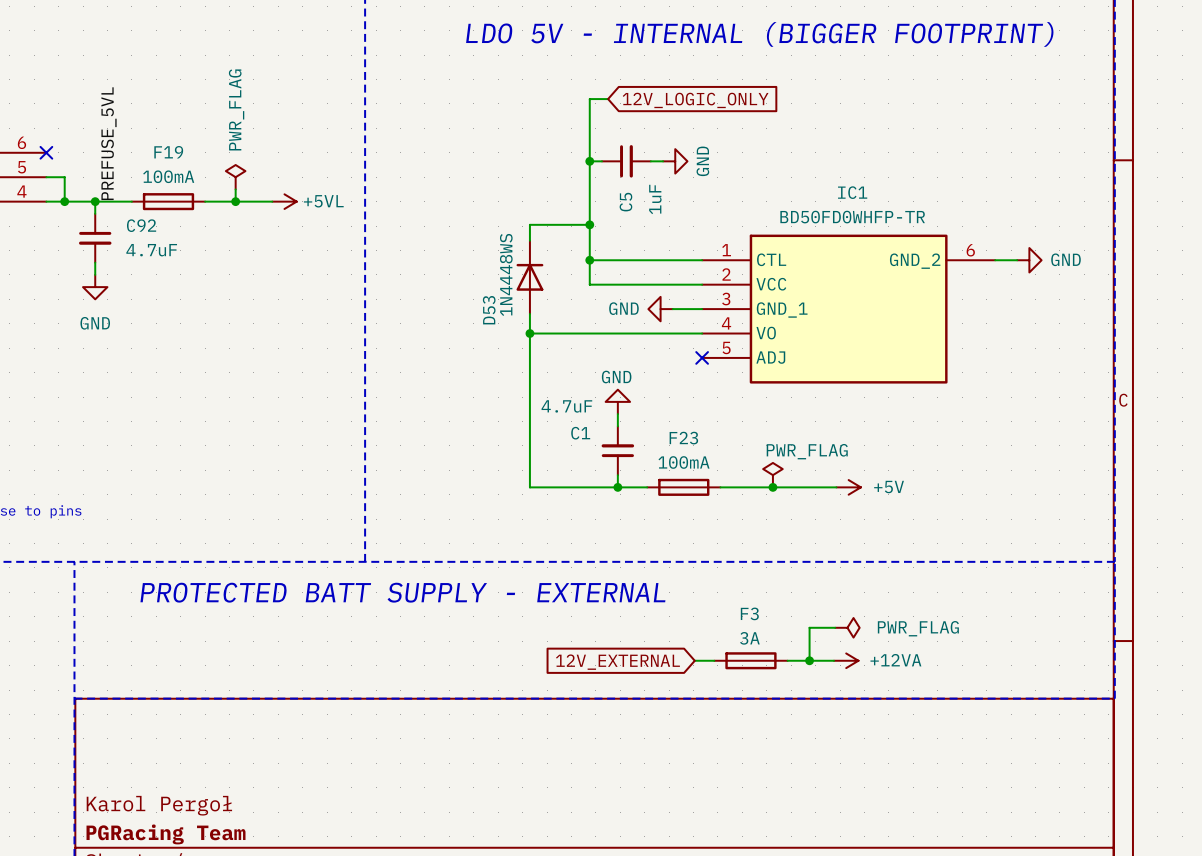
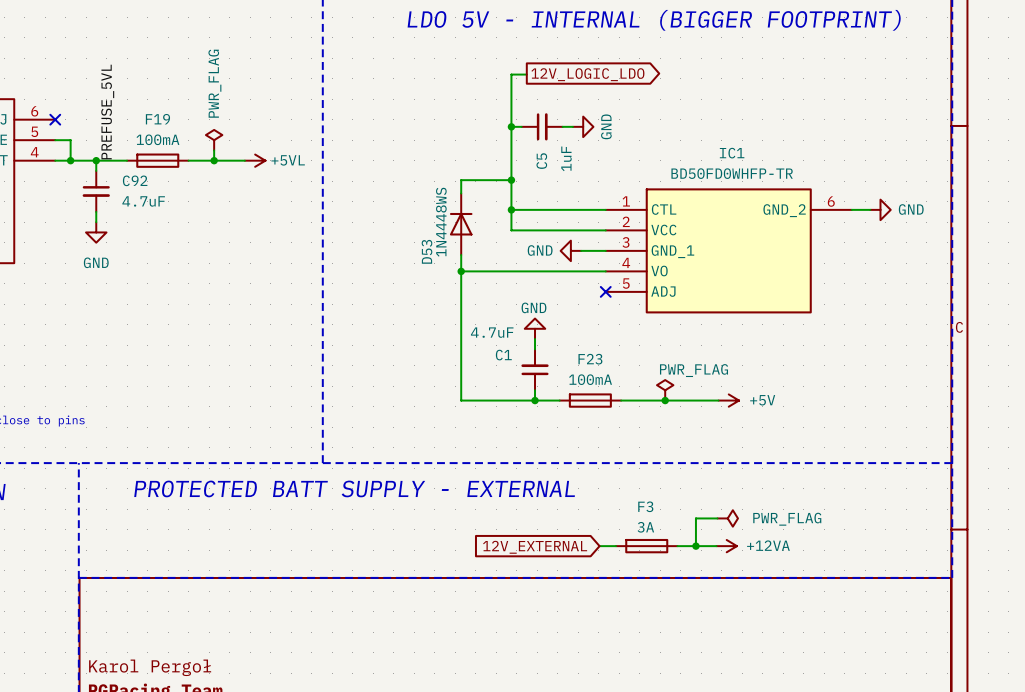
global label shape: input (695, 100) -> output (587, 74)
global label: 12V_LOGIC_ONLY (695, 100) -> 12V_LOGIC_LDO (587, 74)

